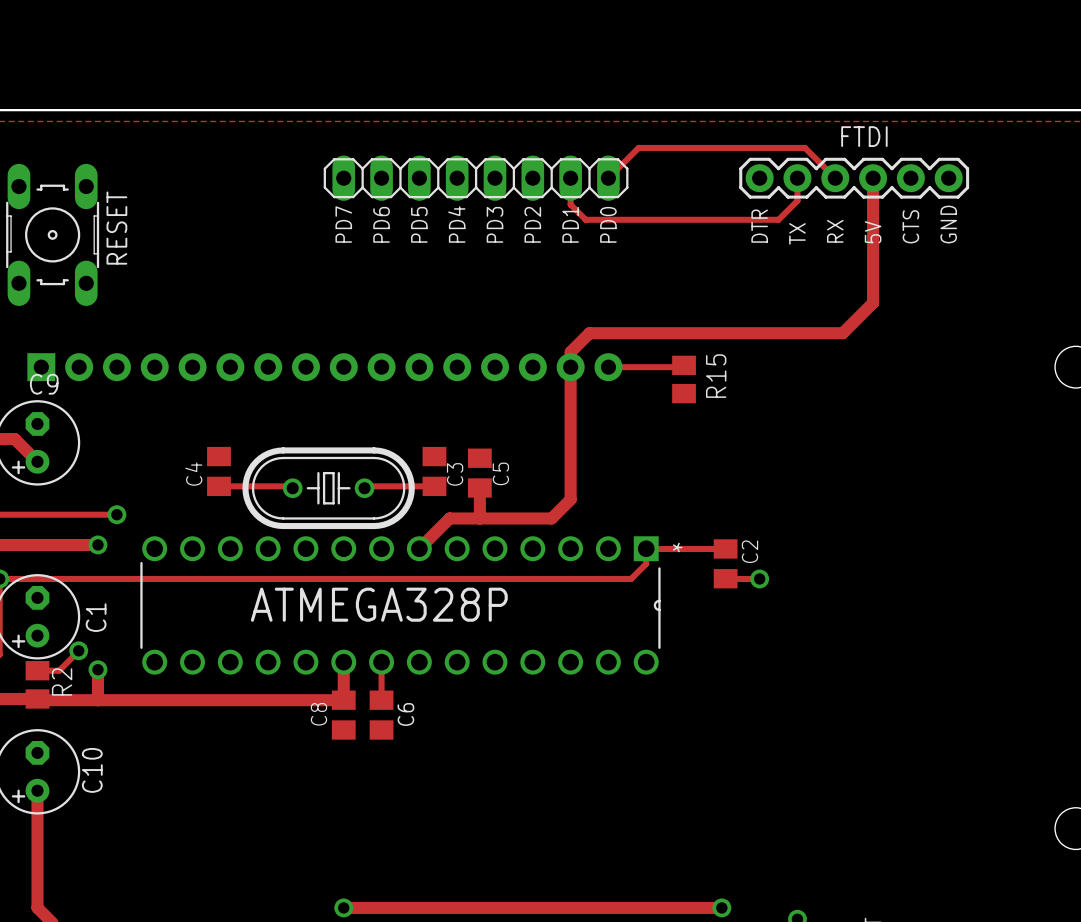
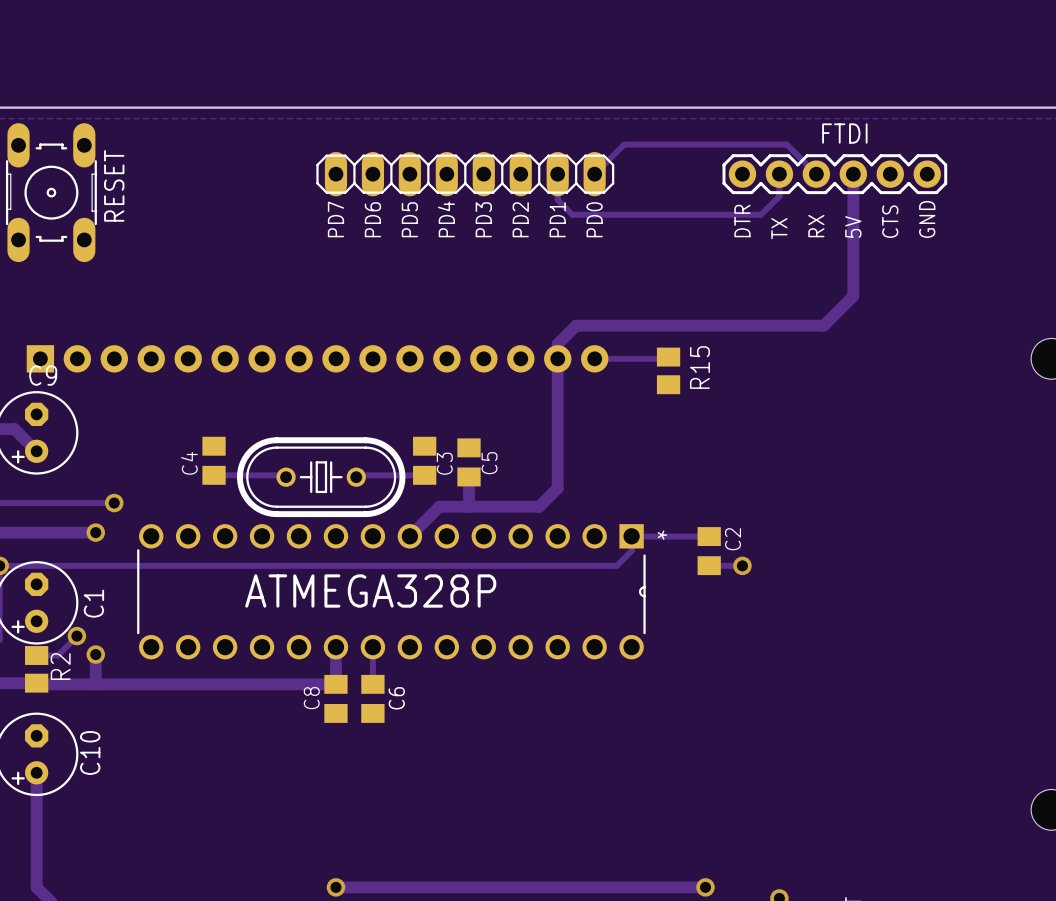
RESET position: (52, 234) -> (51, 192)

